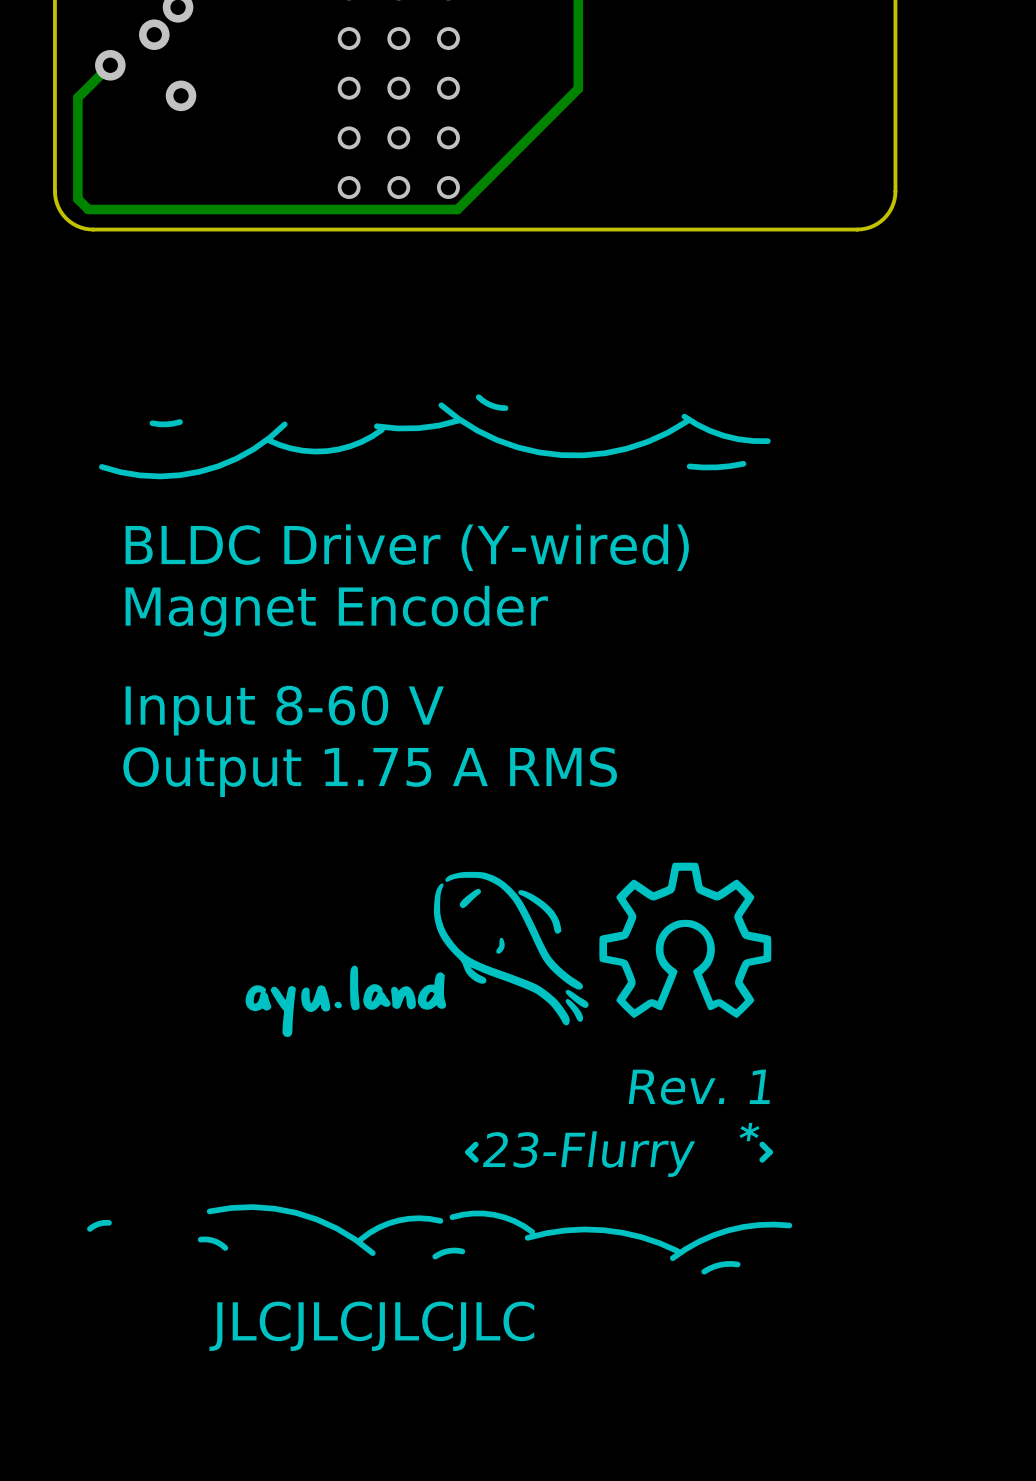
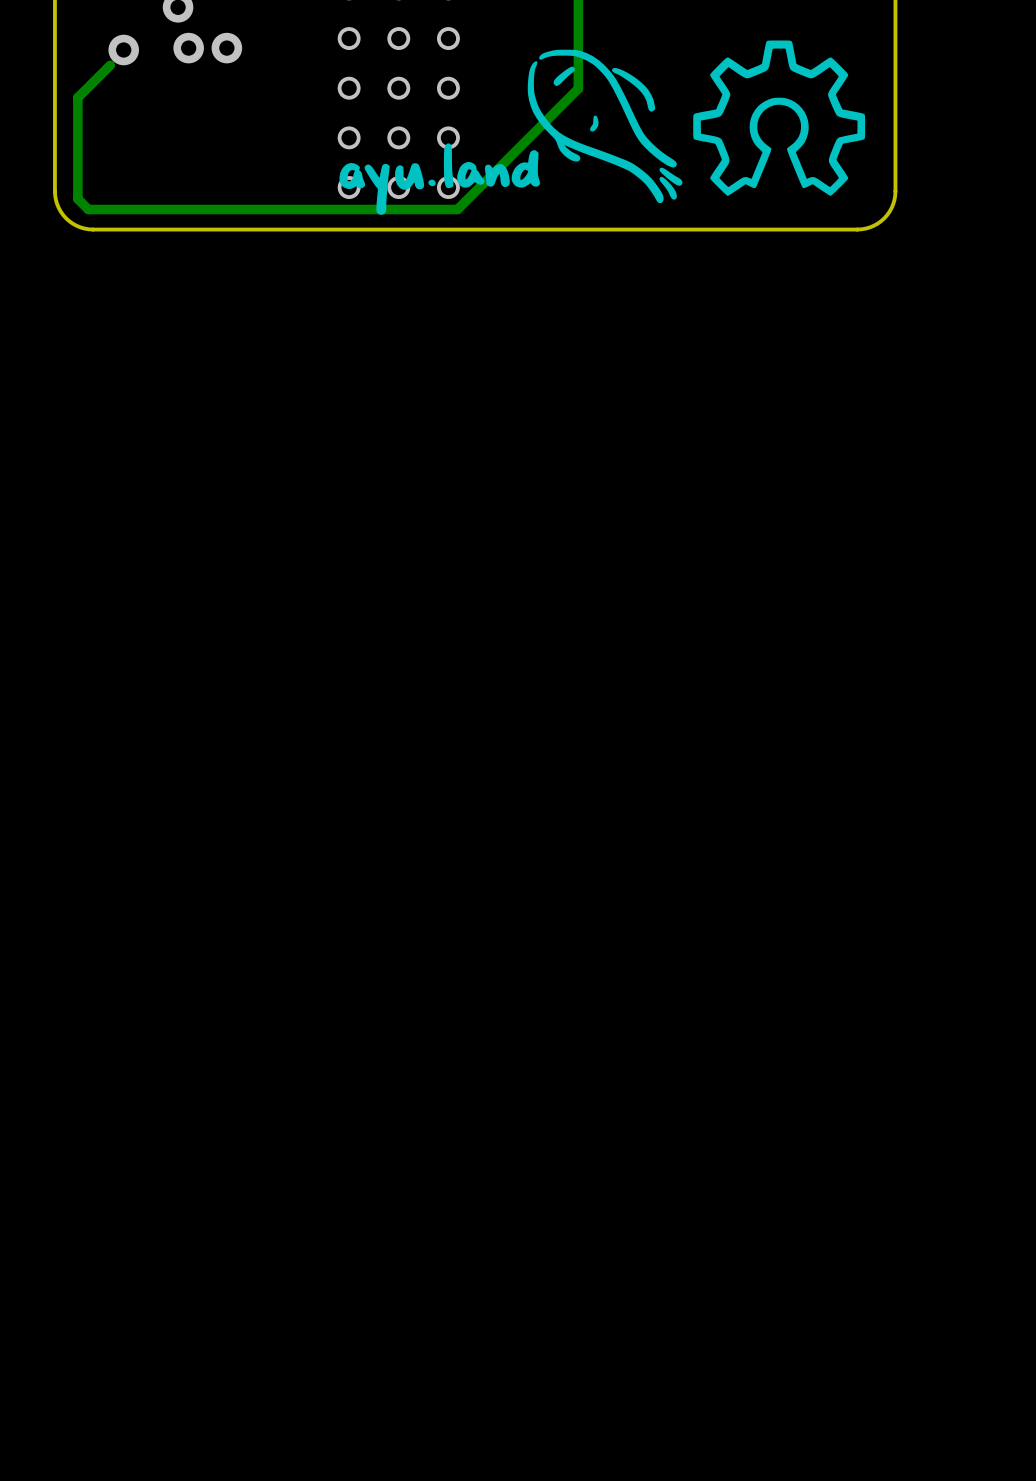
via: (154, 34) -> none
via: none -> (188, 48)
via: none -> (226, 48)
via: none -> (123, 50)
via: (110, 65) -> none
via: (181, 95) -> none
line: (478, 397) (491, 405) (505, 408) -> none
line: (441, 405) (477, 430) (497, 440) (518, 447) (561, 455) (583, 455) (627, 448) (668, 432) (686, 421) -> none
line: (684, 416) (696, 424) (724, 435) (738, 439) (767, 441) -> none
line: (459, 420) (418, 428) (376, 426) -> none
line: (179, 422) (166, 424) (152, 423) -> none
line: (284, 424) (253, 449) (236, 458) (199, 471) (160, 476) (140, 475) (101, 466) -> none
line: (382, 429) (350, 446) (326, 451) (302, 450) (268, 440) -> none
line: (743, 463) (716, 467) (689, 466) -> none
text: BLDC Driver (Y-wired) (407, 547) -> none
text: Magnet Encoder (336, 611) -> none
text: Input 8-60 V (284, 710) -> none
text: Output 1.75 A RMS (370, 772) -> none
drawing position: (685, 940) -> (779, 118)
drawing position: (511, 948) -> (605, 126)
drawing position: (345, 1001) -> (439, 179)
text: Rev. 1 (699, 1087) -> none
text: * (749, 1132) -> none
line: (475, 1144) (468, 1152) (475, 1159) -> none
line: (762, 1144) (769, 1152) (762, 1159) -> none
text: 23-Flurry (589, 1154) -> none
line: (209, 1211) (253, 1207) (296, 1212) (336, 1228) (372, 1253) -> none
line: (452, 1217) (473, 1213) (494, 1214) (514, 1221) (532, 1231) -> none
line: (440, 1220) (419, 1218) (398, 1220) (378, 1227) (361, 1239) -> none
line: (108, 1222) (98, 1223) (89, 1228) -> none
line: (789, 1225) (758, 1225) (727, 1230) (699, 1241) (672, 1258) -> none
line: (527, 1237) (565, 1230) (603, 1230) (641, 1237) (677, 1251) -> none
line: (200, 1239) (213, 1240) (225, 1248) -> none
line: (462, 1251) (448, 1251) (435, 1256) -> none
line: (737, 1264) (720, 1264) (704, 1271) -> none
text: JLCJLCJLCJLC (371, 1326) -> none

